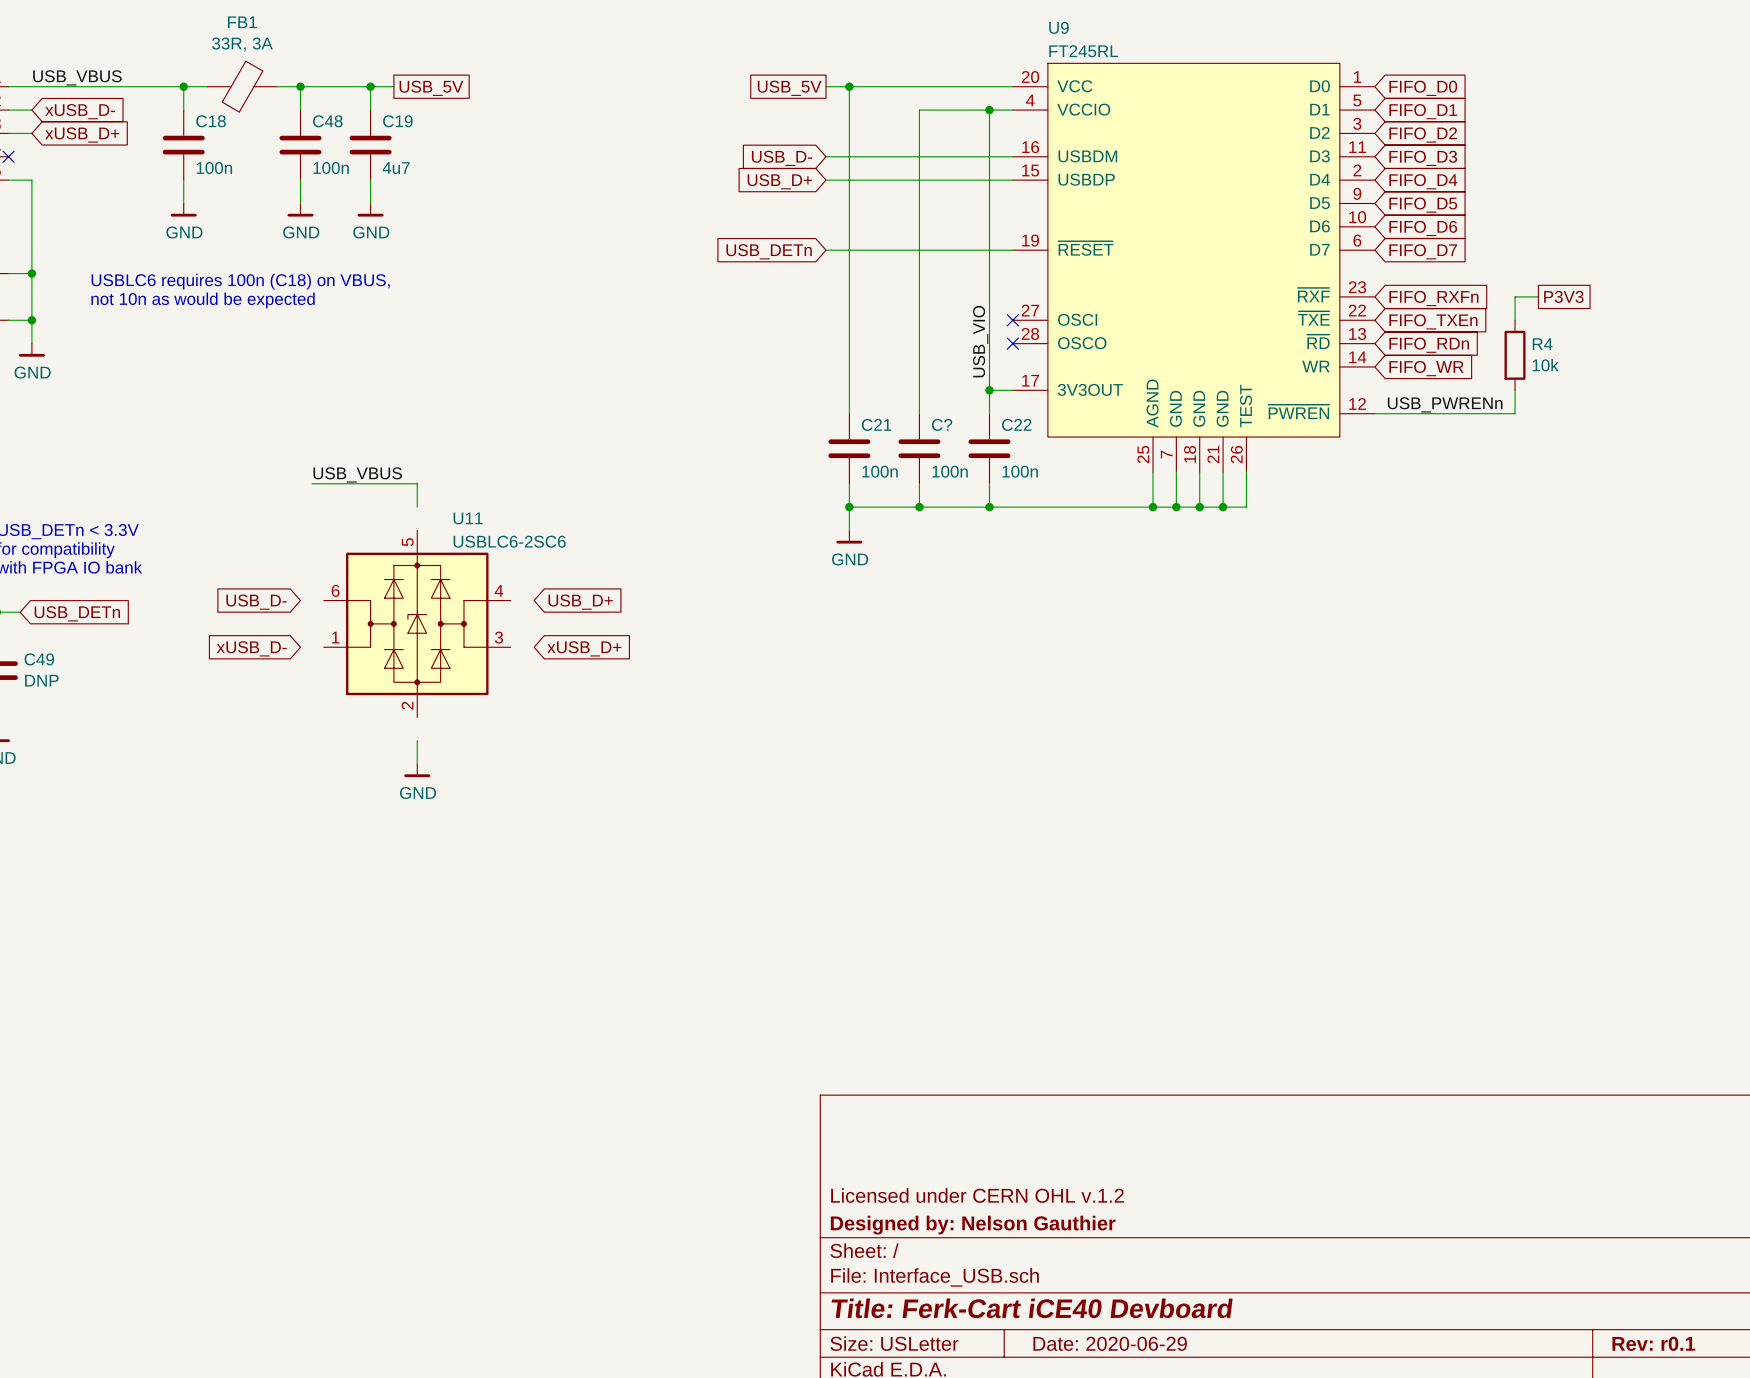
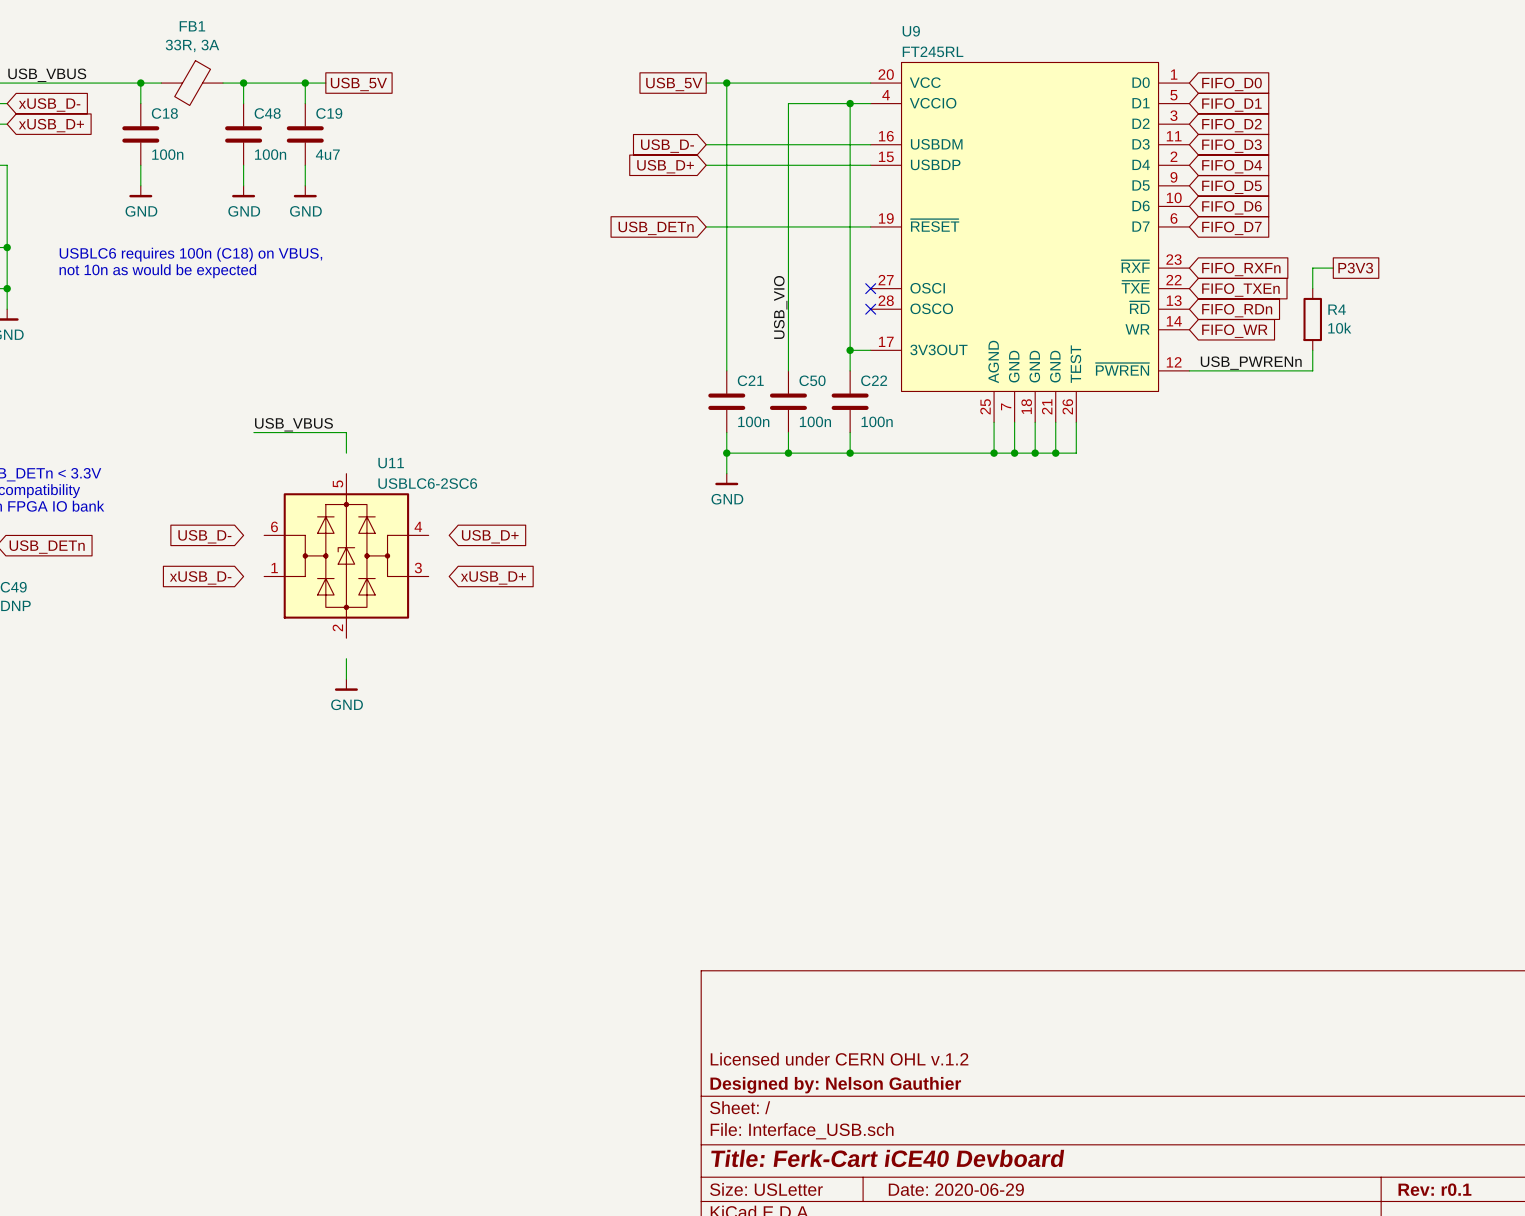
label position: USB_VIO (980, 341) -> USB_VIO (780, 307)
C? name: C? (942, 424) -> C50 (812, 380)

